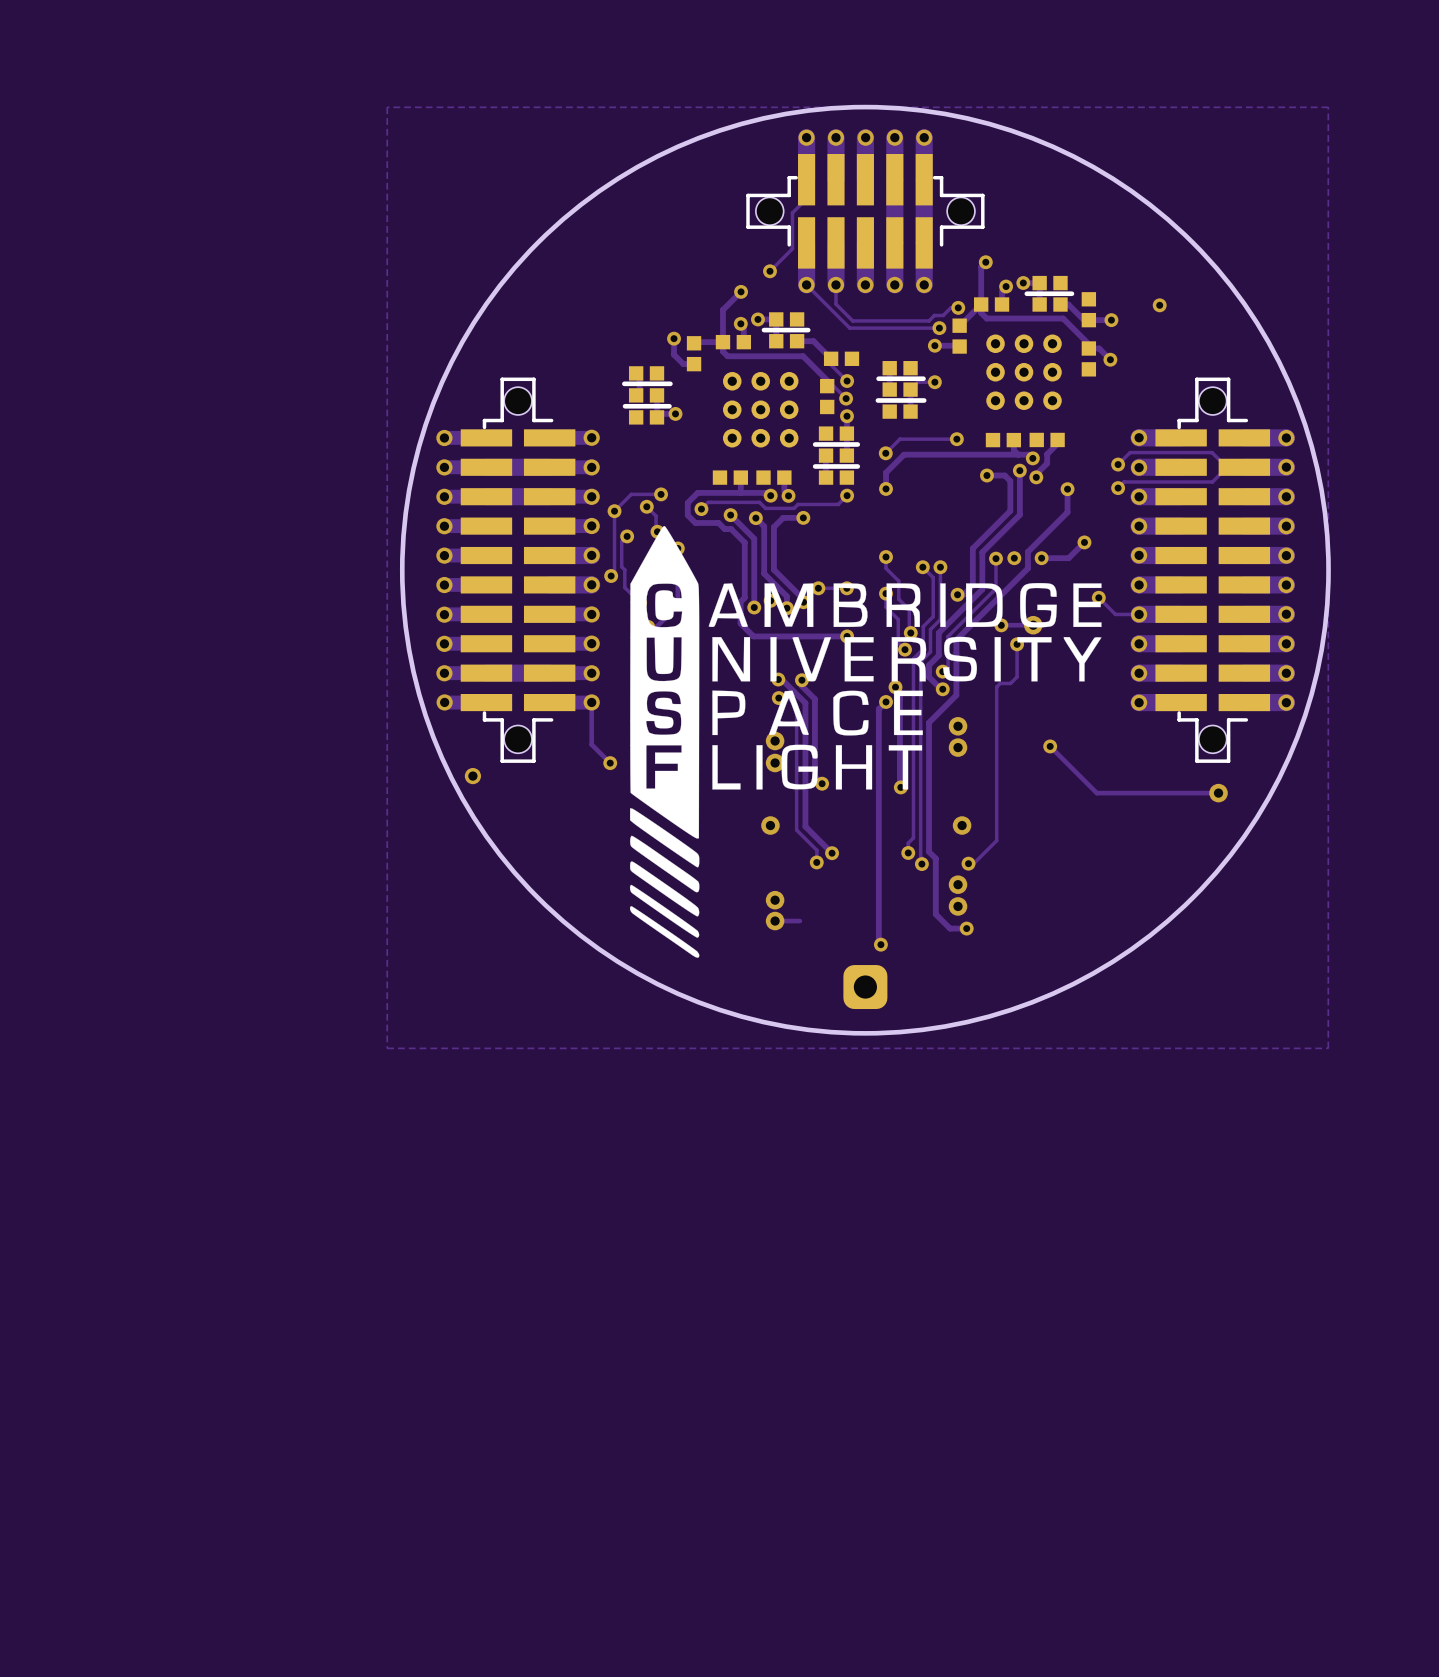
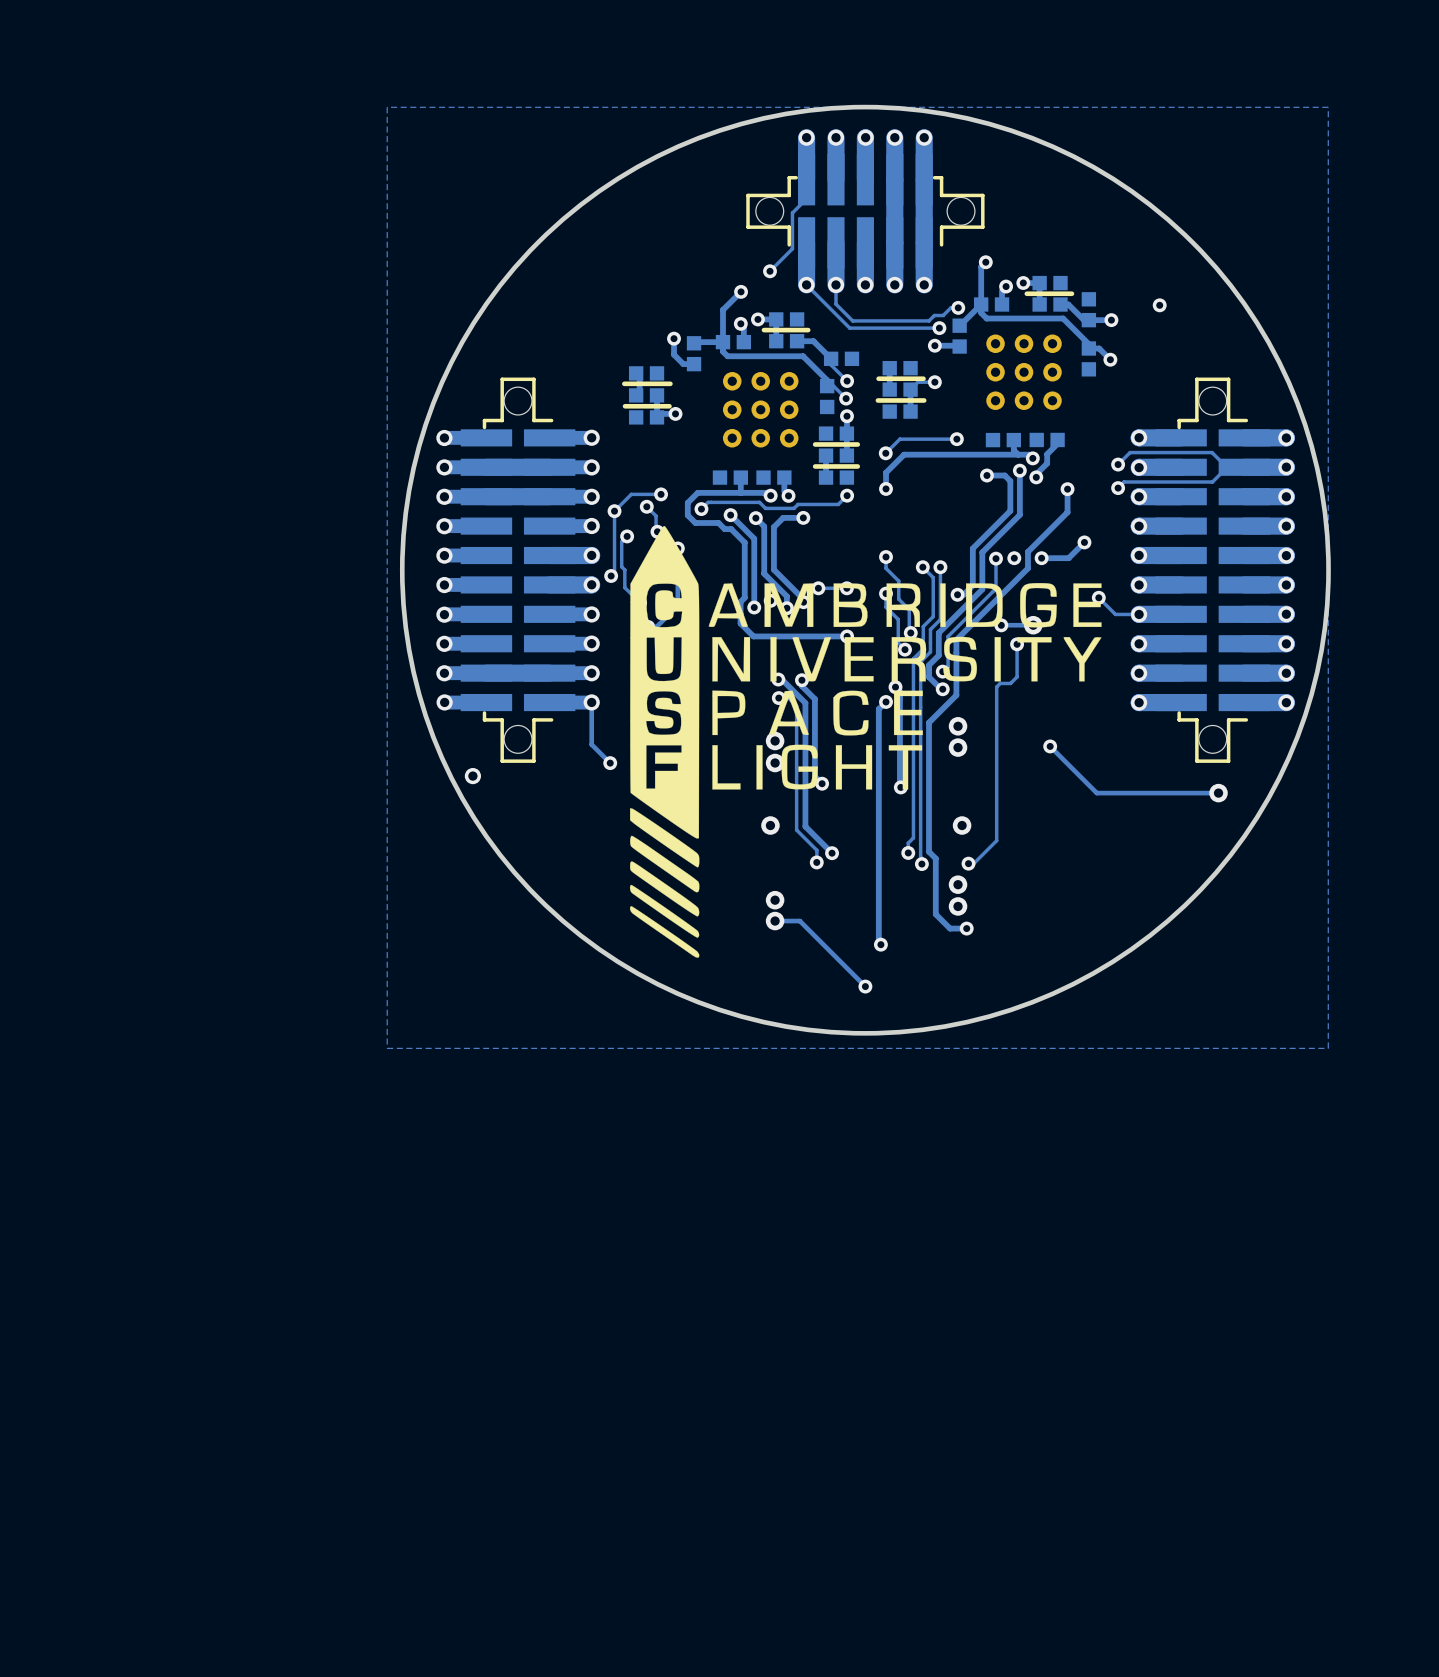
track: none -> (799, 921) (865, 986)
via: none -> (865, 986)
part: (865, 987) -> none

